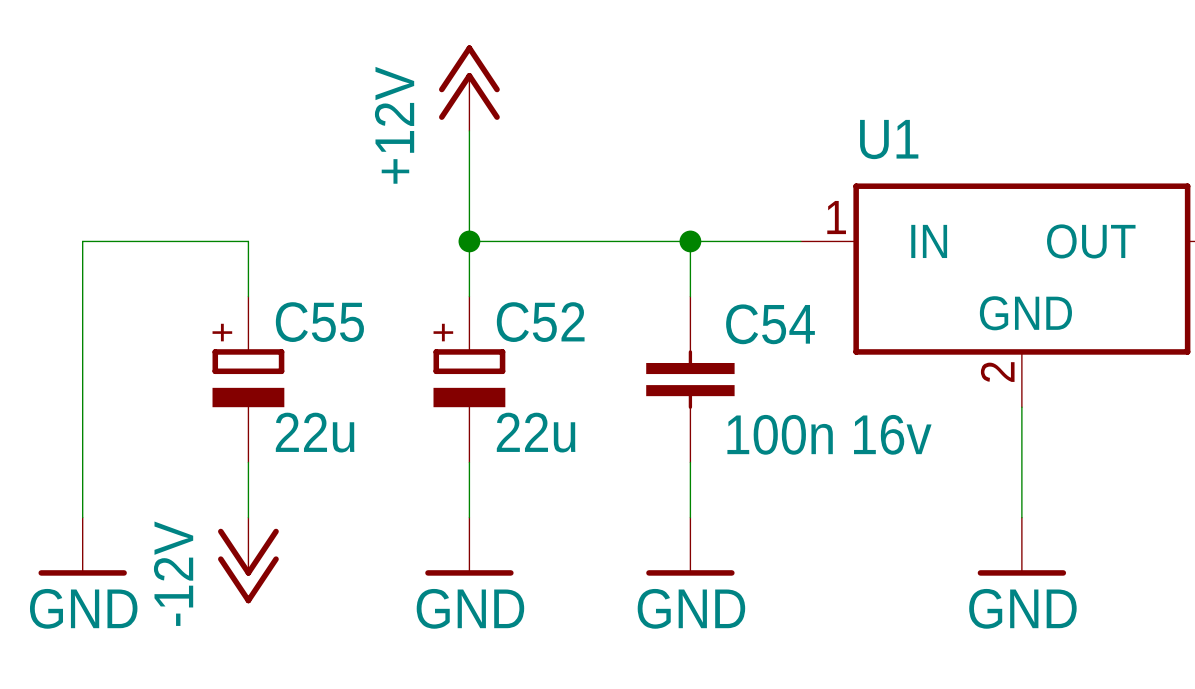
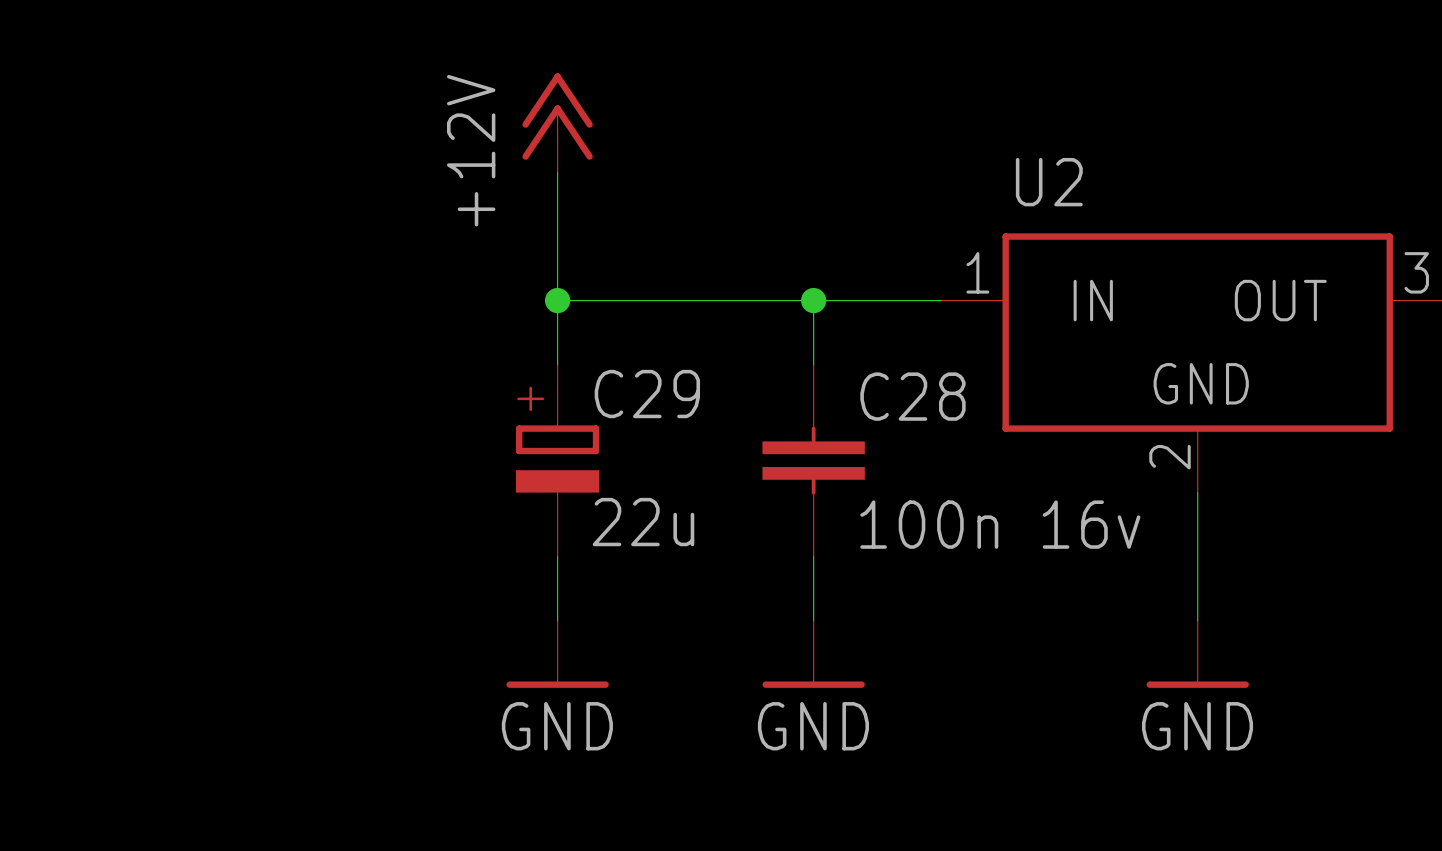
U1 name: U1 (889, 139) -> U2 (1049, 182)
wire: (248, 296) (248, 241) (82, 241) (82, 517) -> none
C52 name: C52 (540, 322) -> C29 (647, 394)
C54 name: C54 (770, 324) -> C28 (912, 396)
C55: 22u (248, 379) -> none
wire: (248, 462) (248, 517) -> none
power symbol: GND (82, 546) -> none
power symbol: -12V (248, 560) -> none

